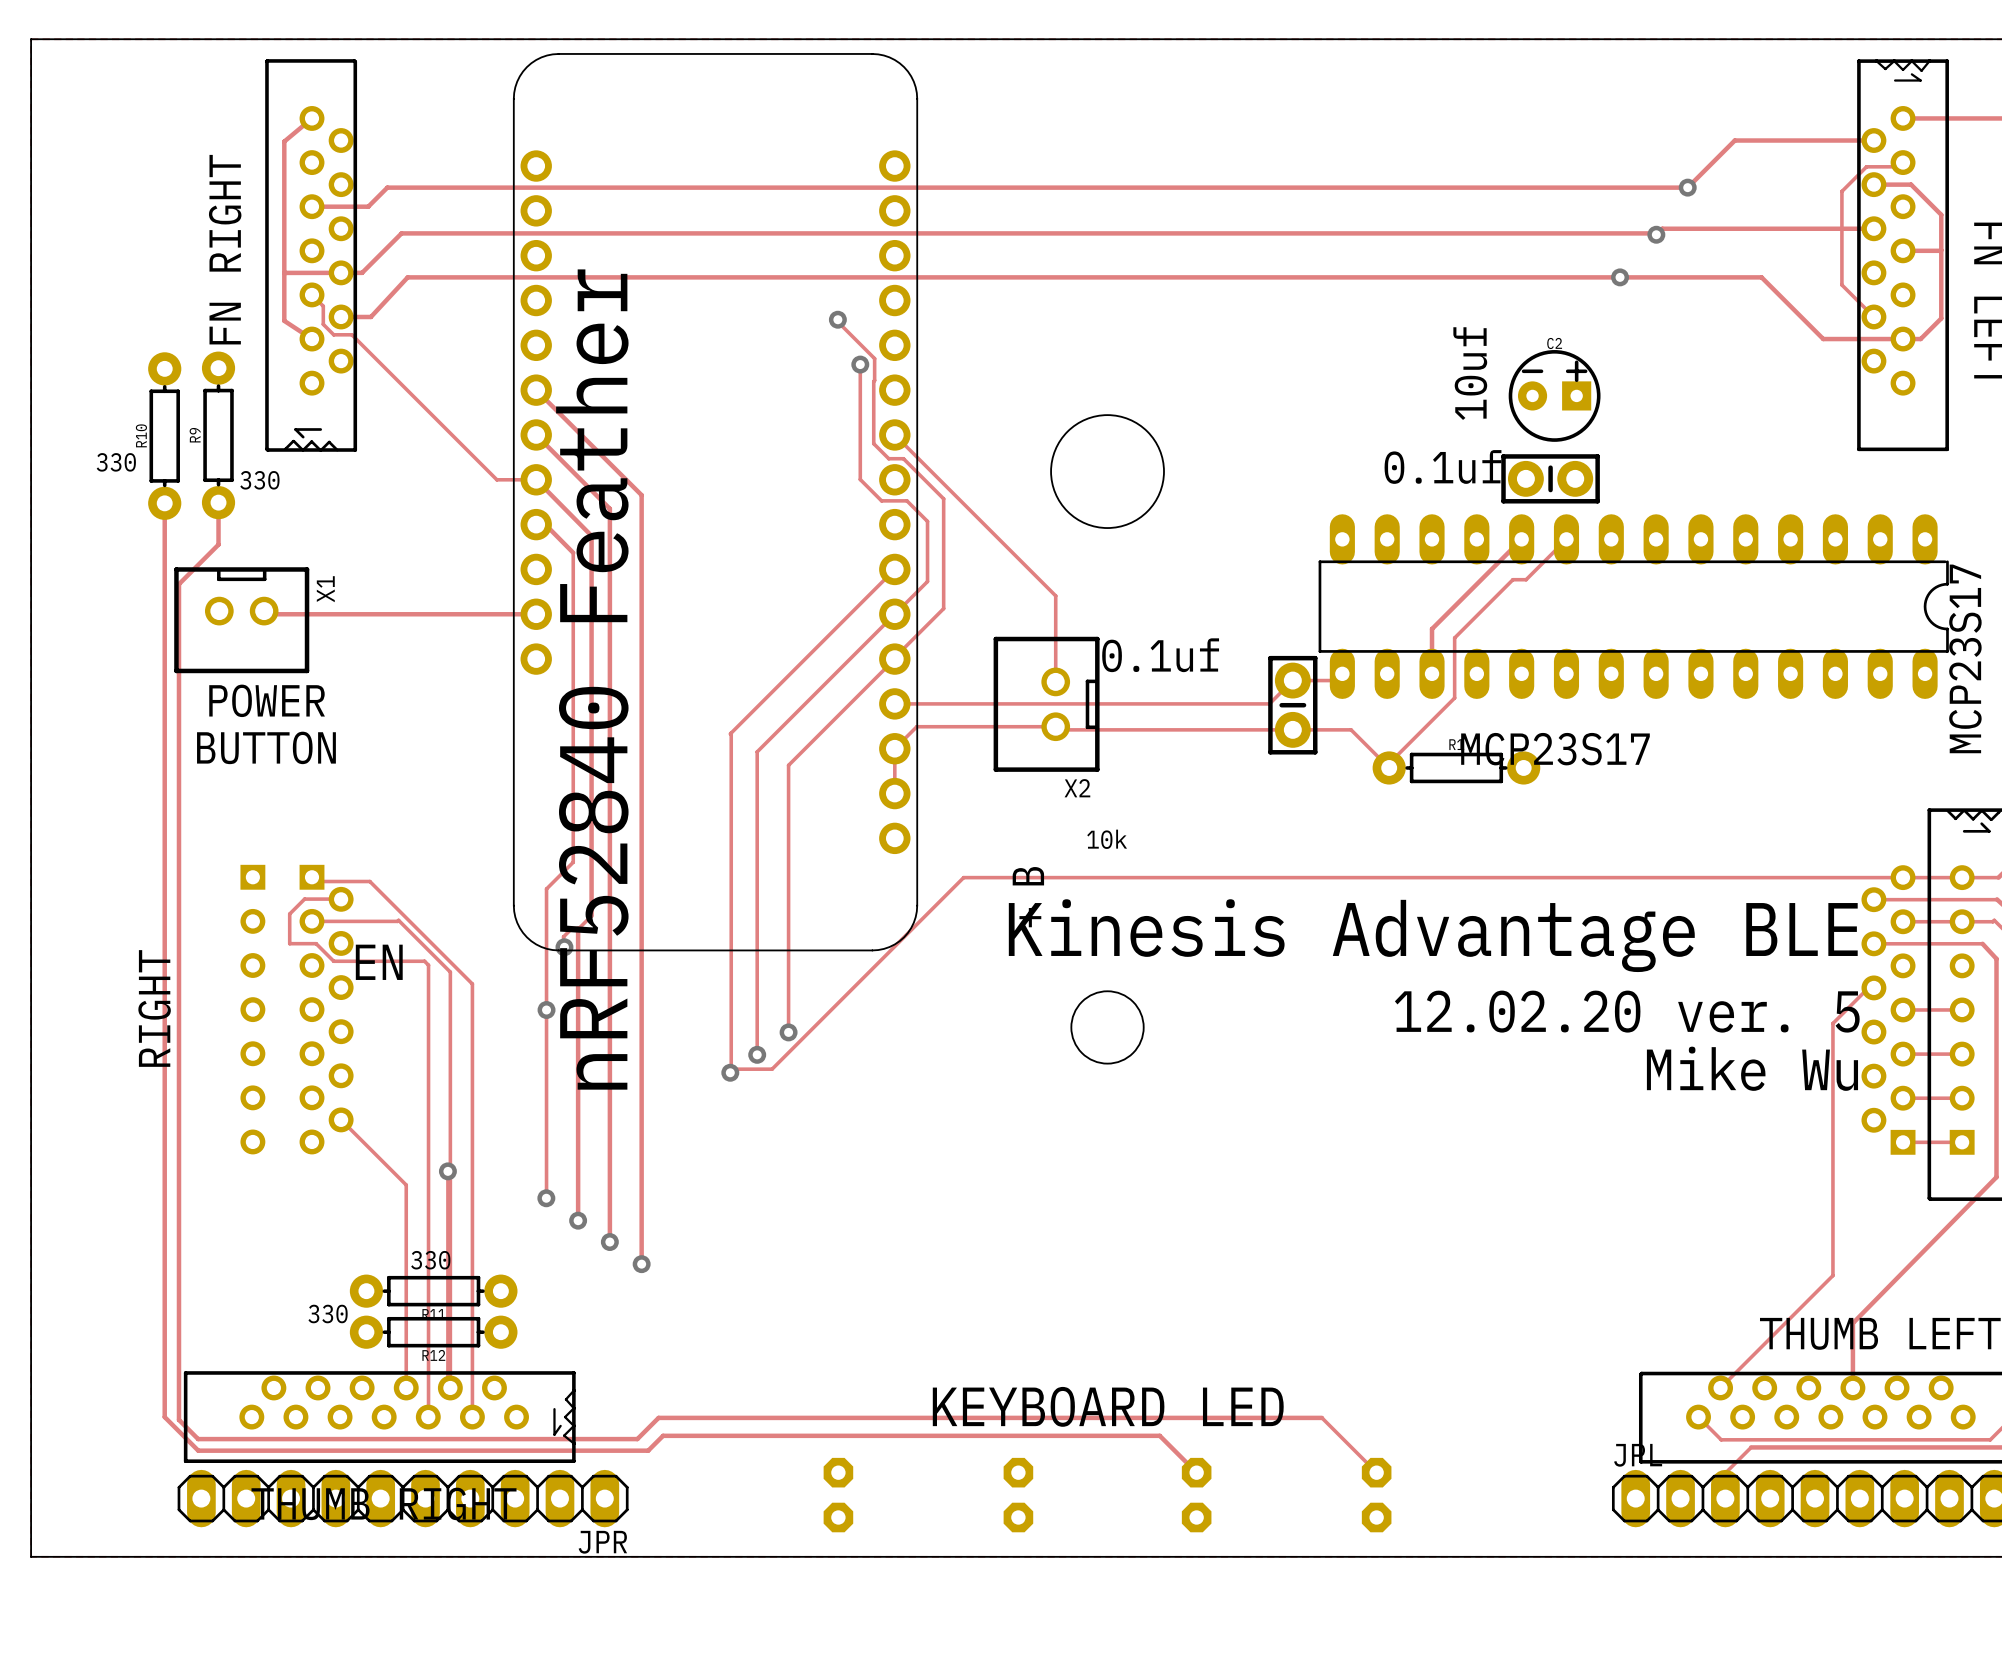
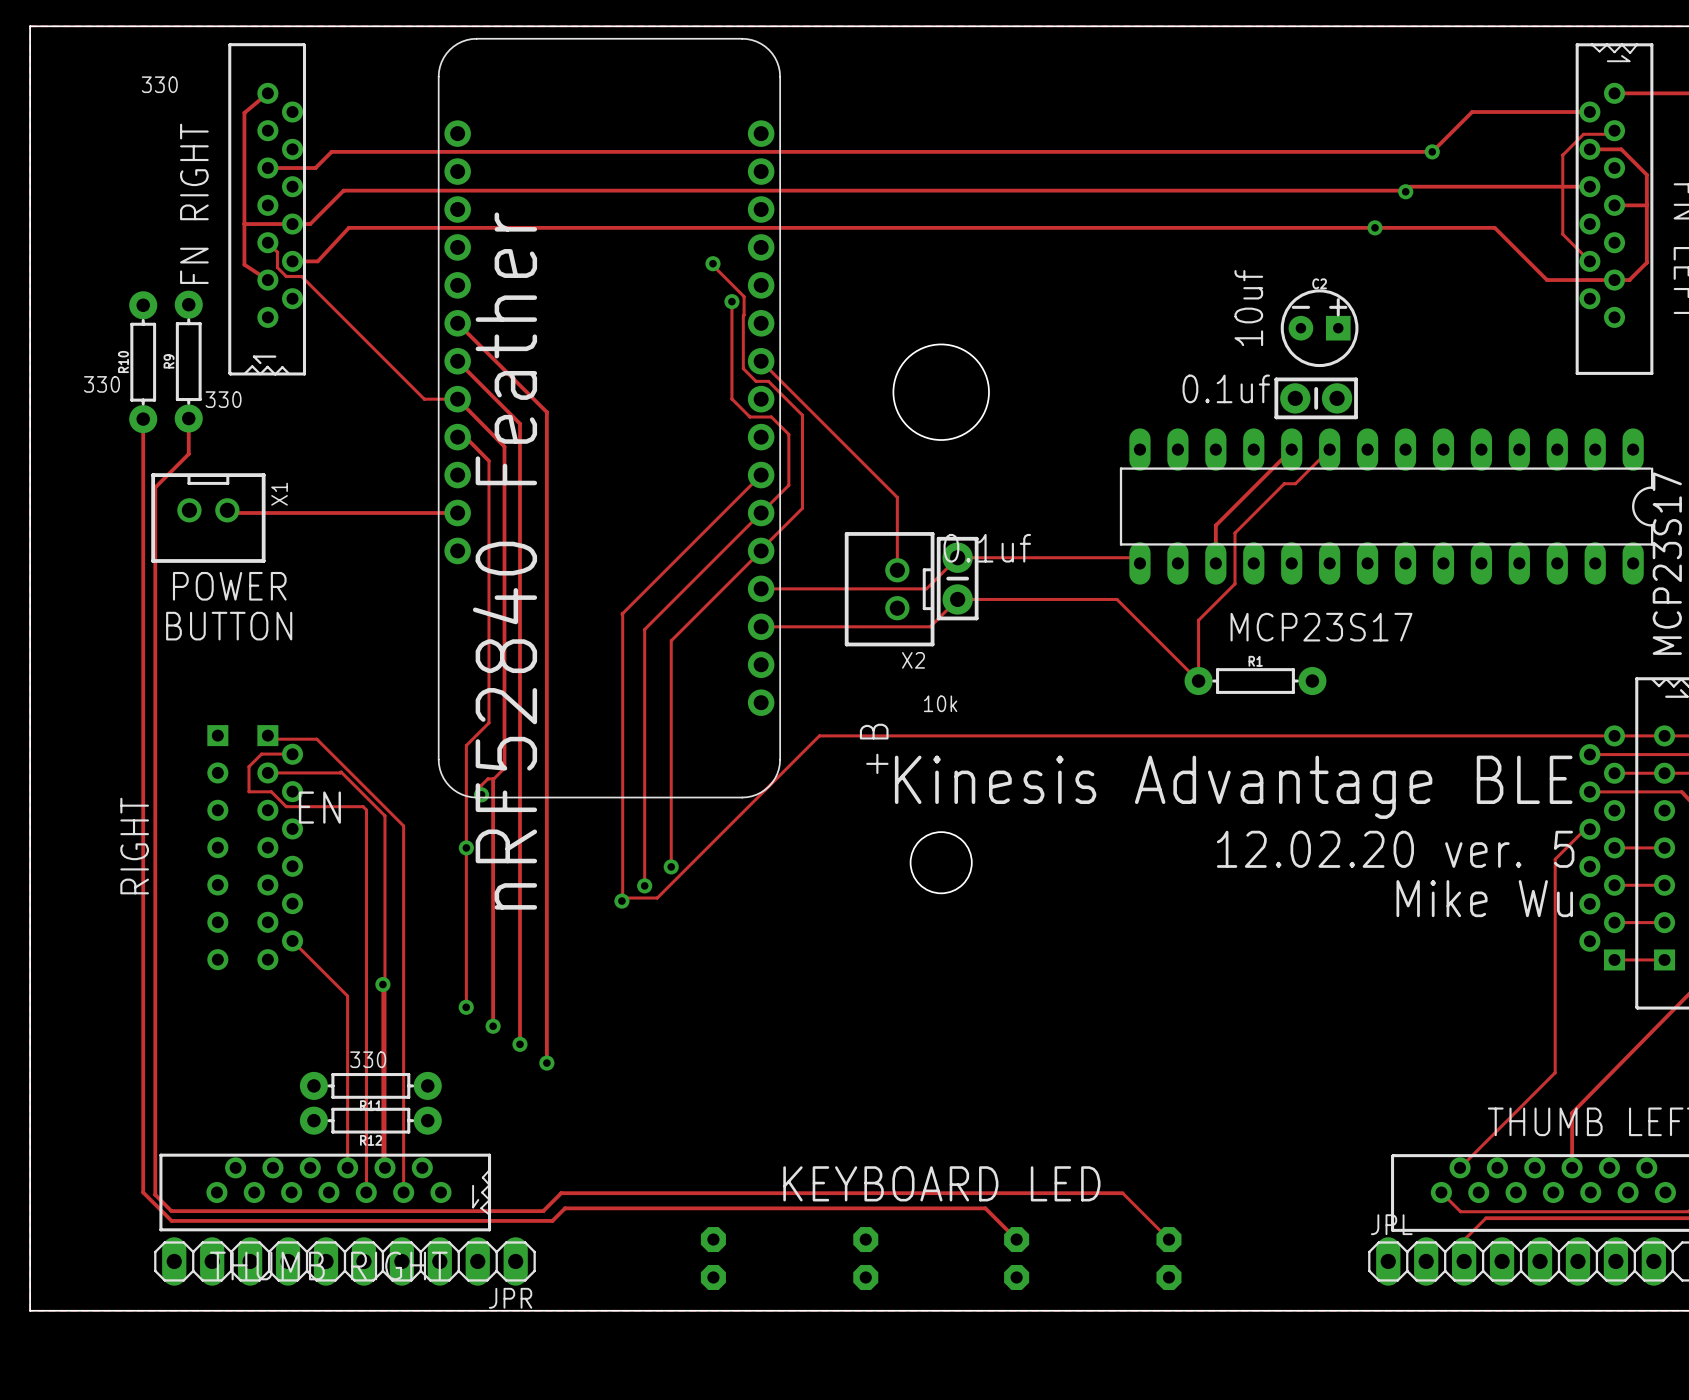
text: none -> 330 (159, 84)
track: (1342, 673) (1335, 680) (1292, 680) (1269, 703) (1090, 703) -> (1139, 563) (1134, 557) (957, 557) (926, 588)
part position: (1292, 705) -> (957, 578)
track: (1411, 741) (1389, 763) (1389, 767) (1351, 729) (1058, 729) (1055, 726) (916, 726) (894, 748) (894, 793) -> (1198, 620) (1198, 681) (1117, 599) (957, 599) (930, 626) (761, 626)
R1 position: (1456, 767) -> (1255, 681)
text: 330 (328, 1313) -> none

